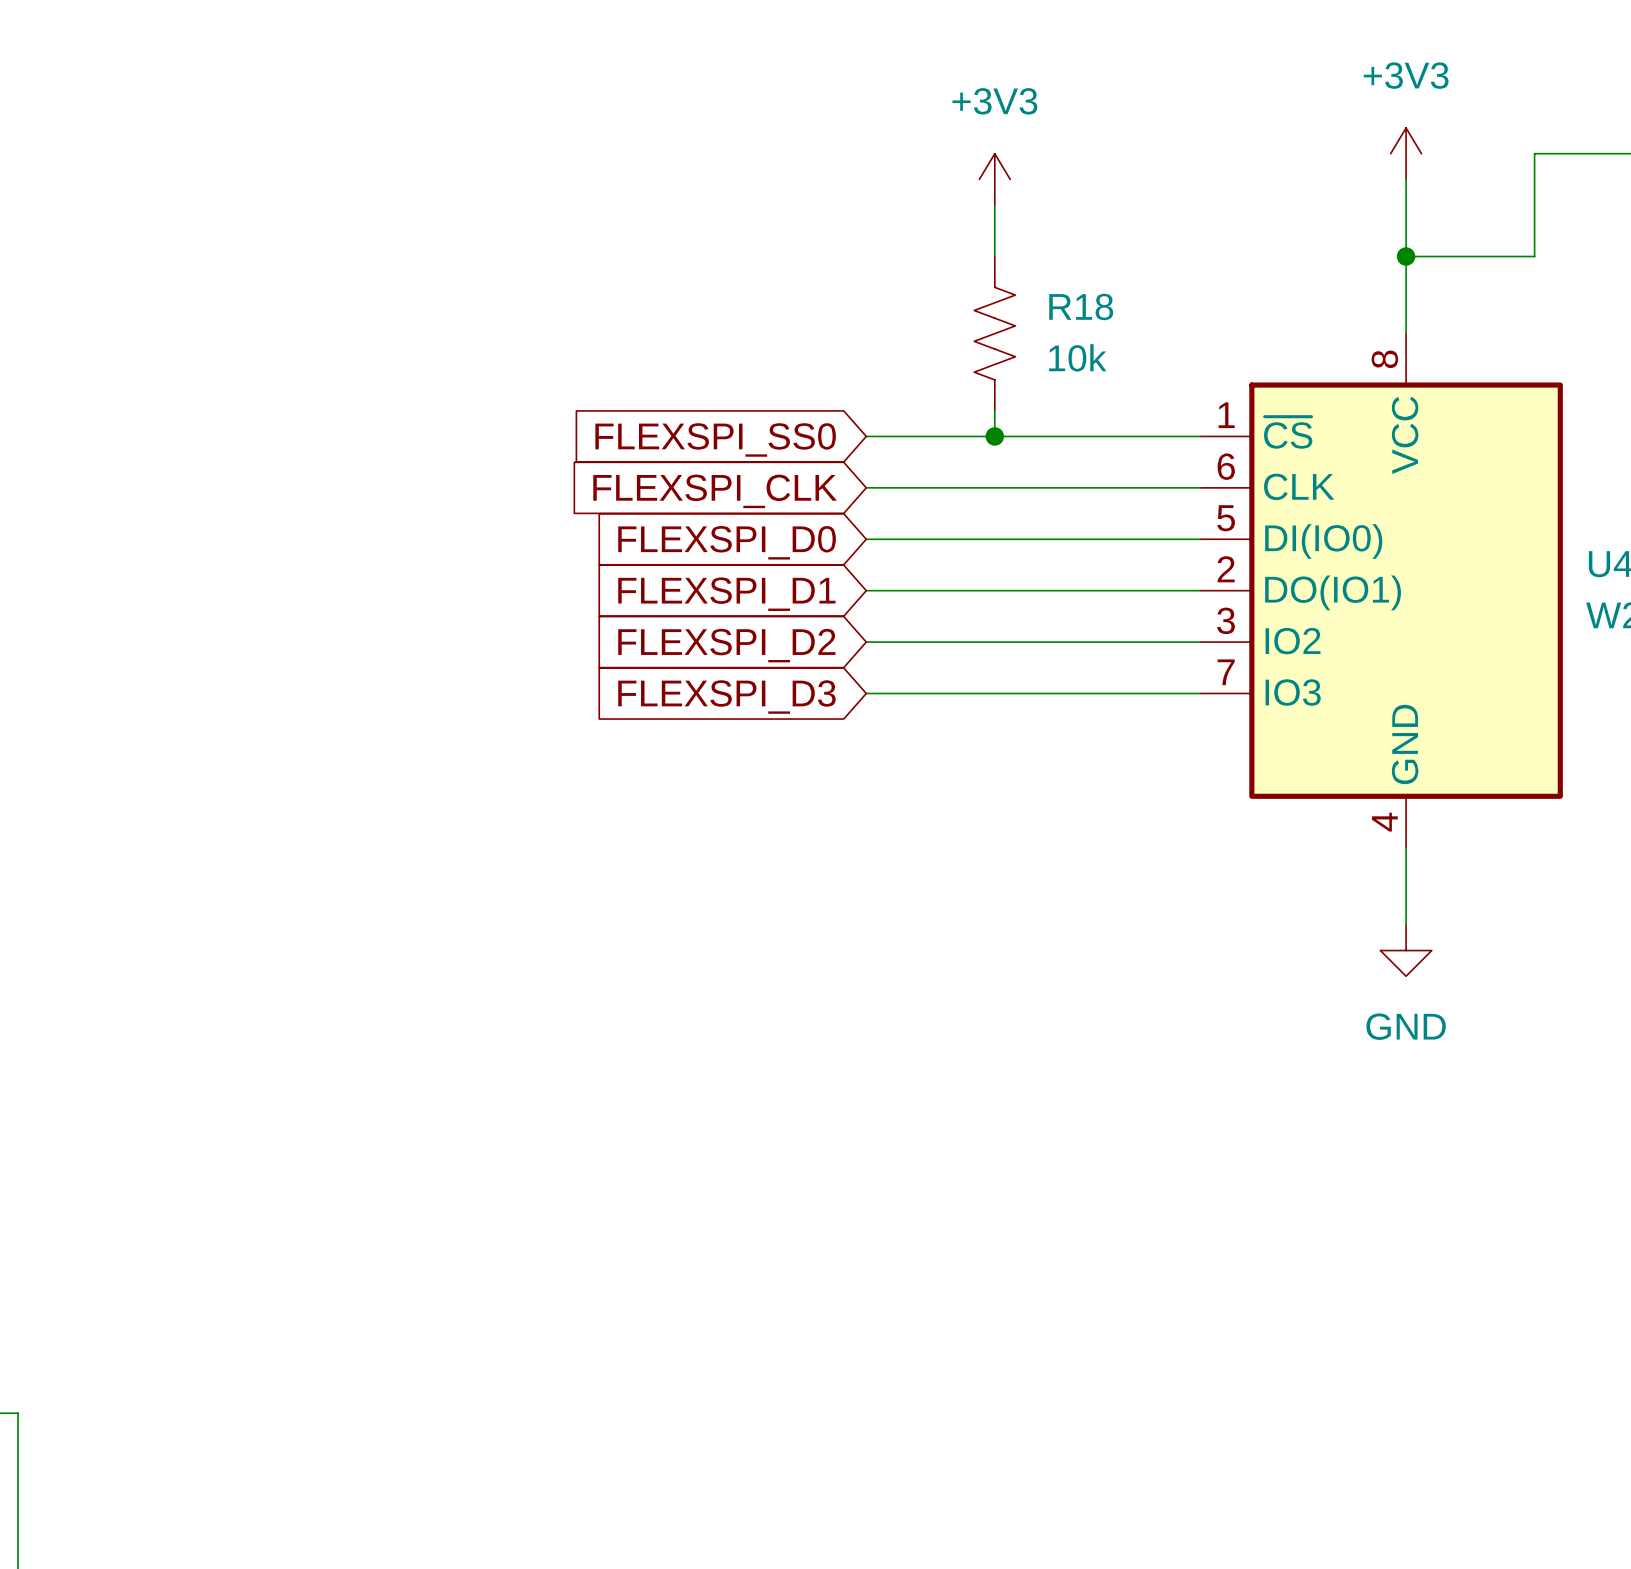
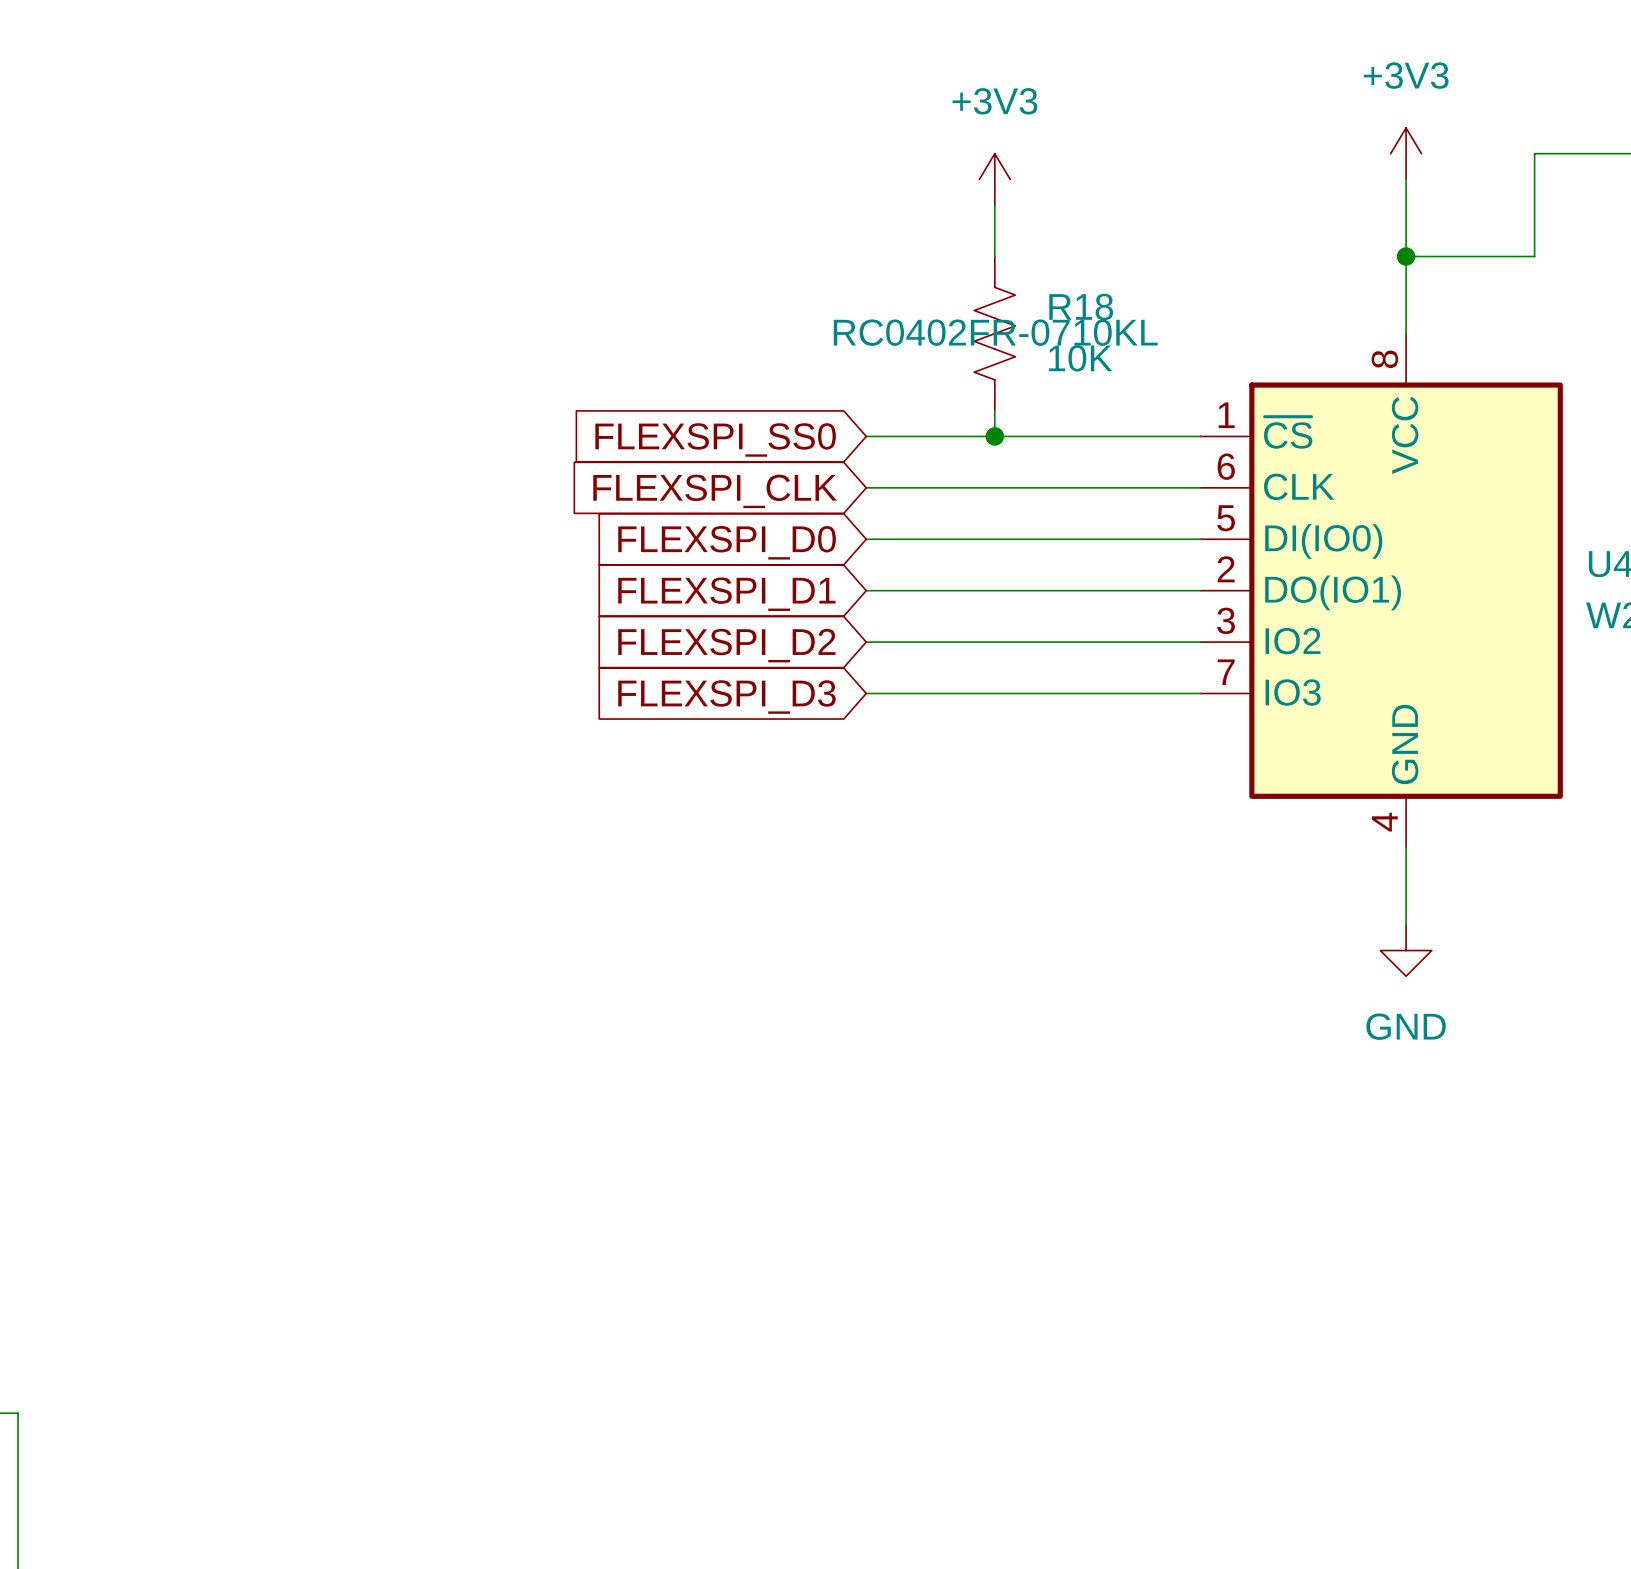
R18 text: none -> RC0402FR-0710KL (995, 332)
R18 value: 10k (1077, 357) -> 10K (1080, 358)

